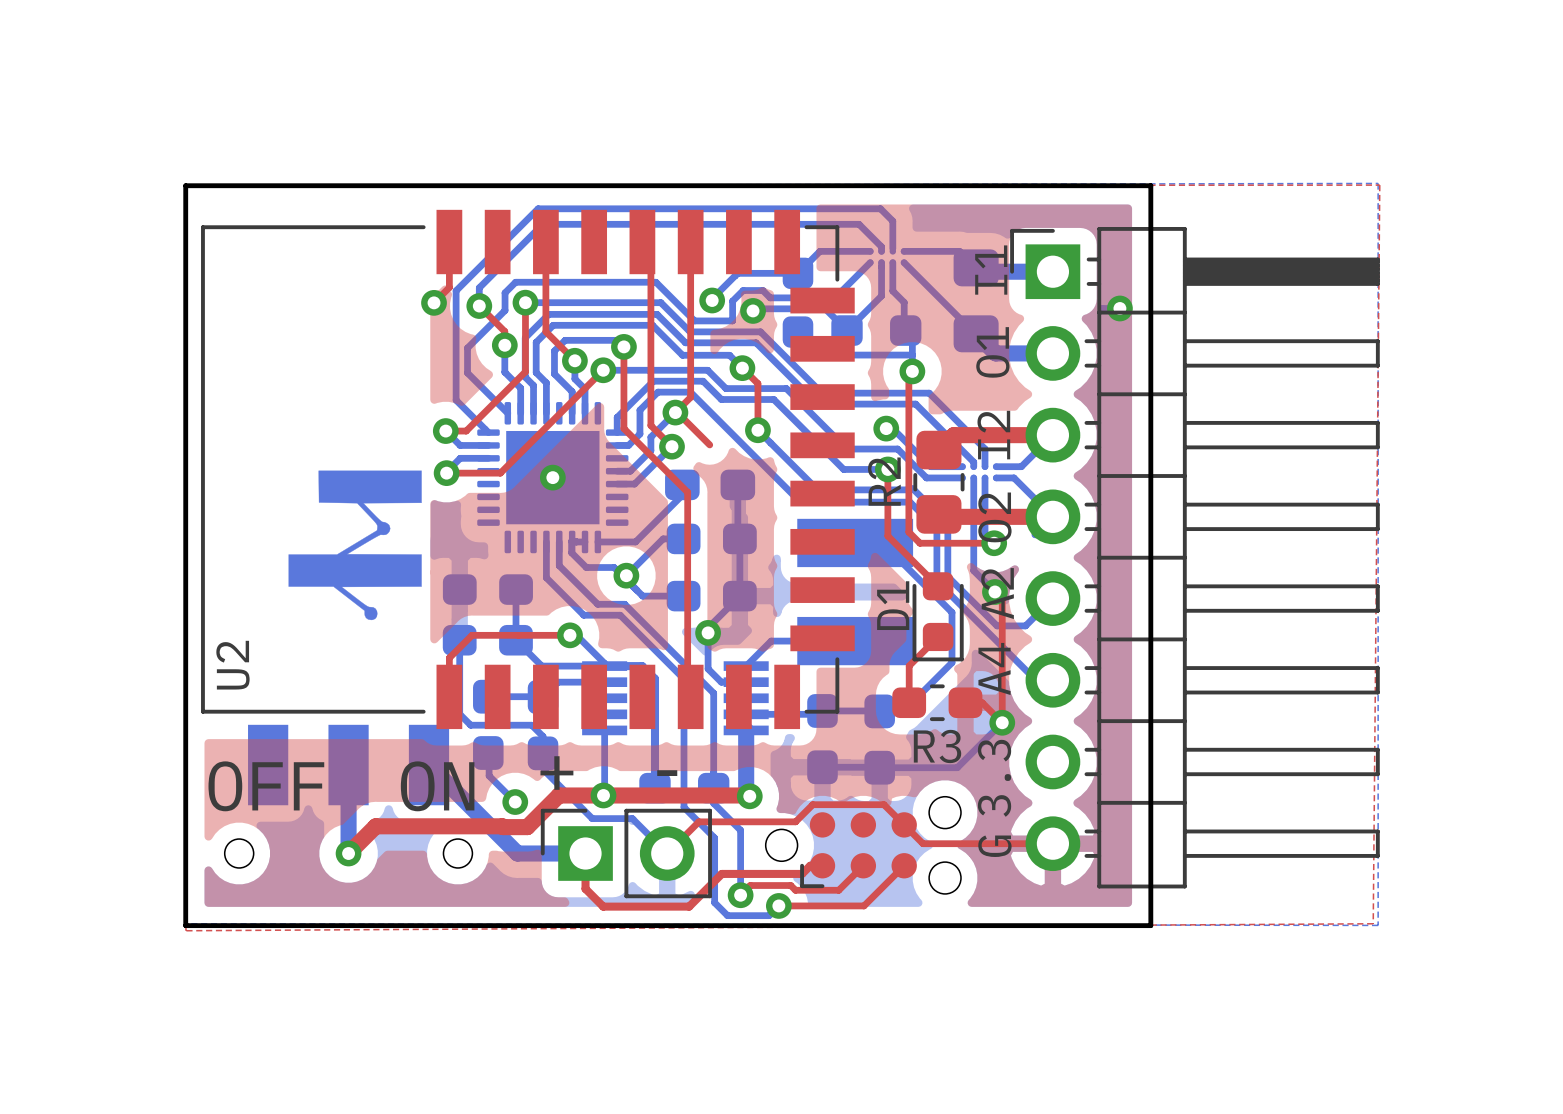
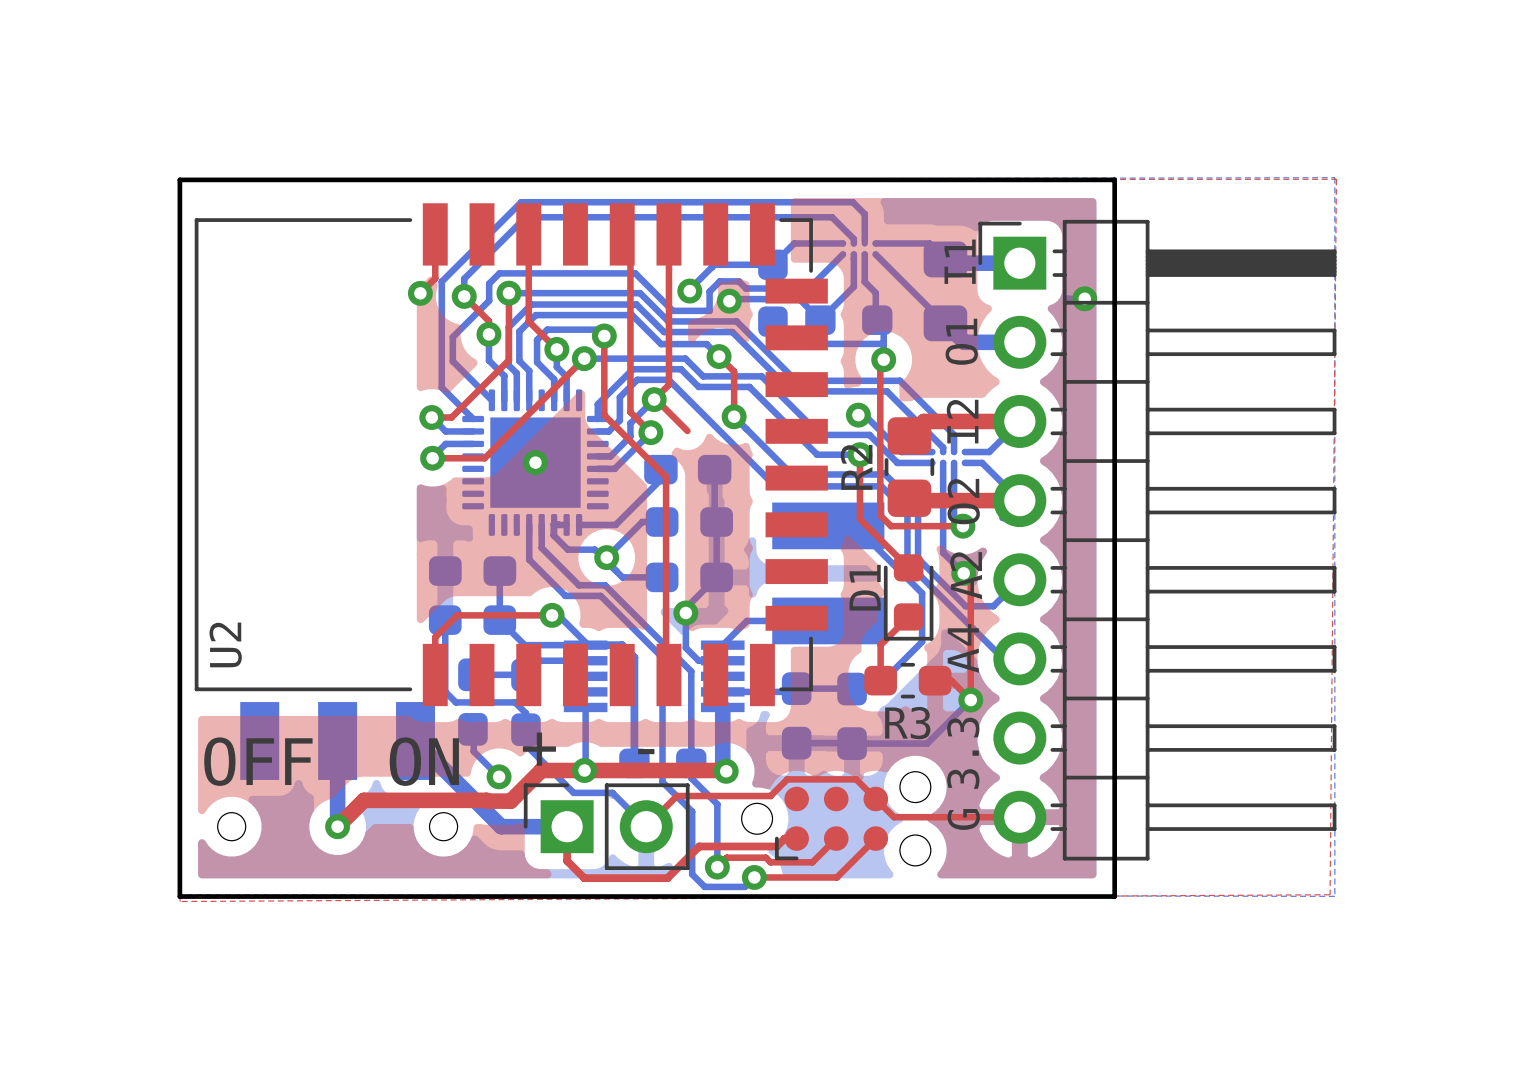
drawing: [288, 470, 422, 621] -> none

